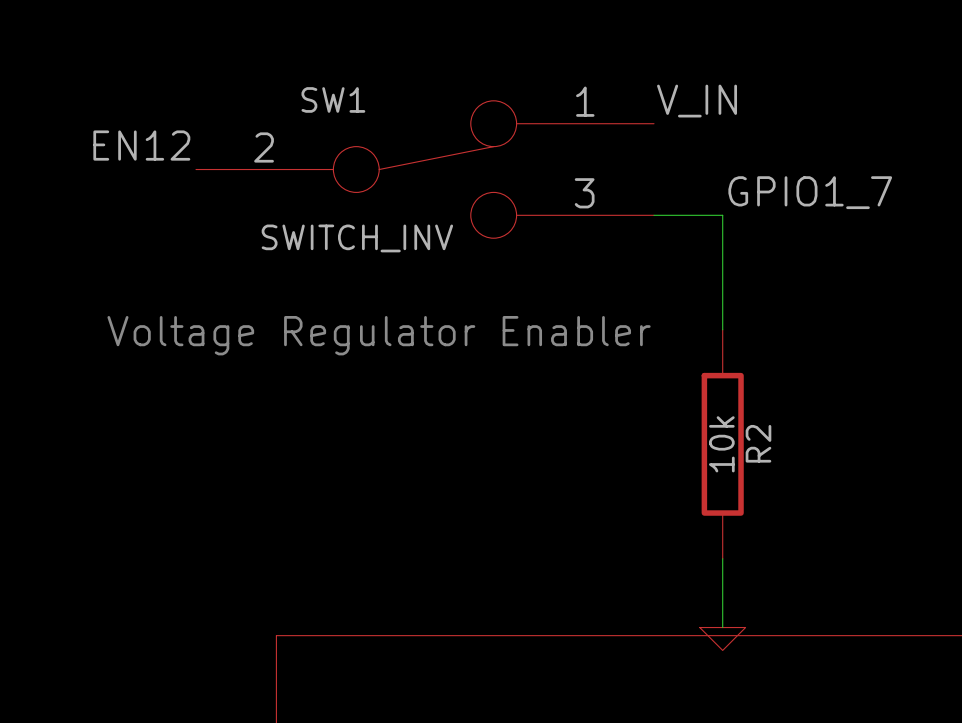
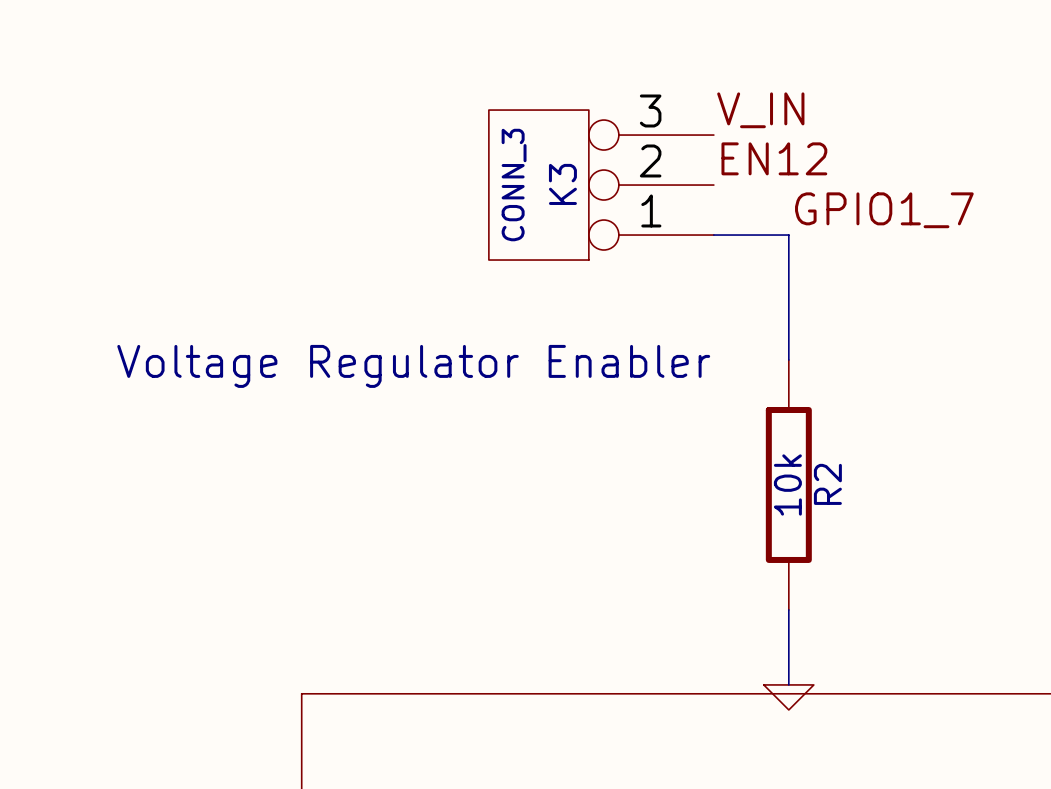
label: EN12 (141, 145) -> none
label: none -> EN12 (774, 158)
SW1: SWITCH_INV (424, 169) -> none
K3: none -> CONN_3 (601, 185)

